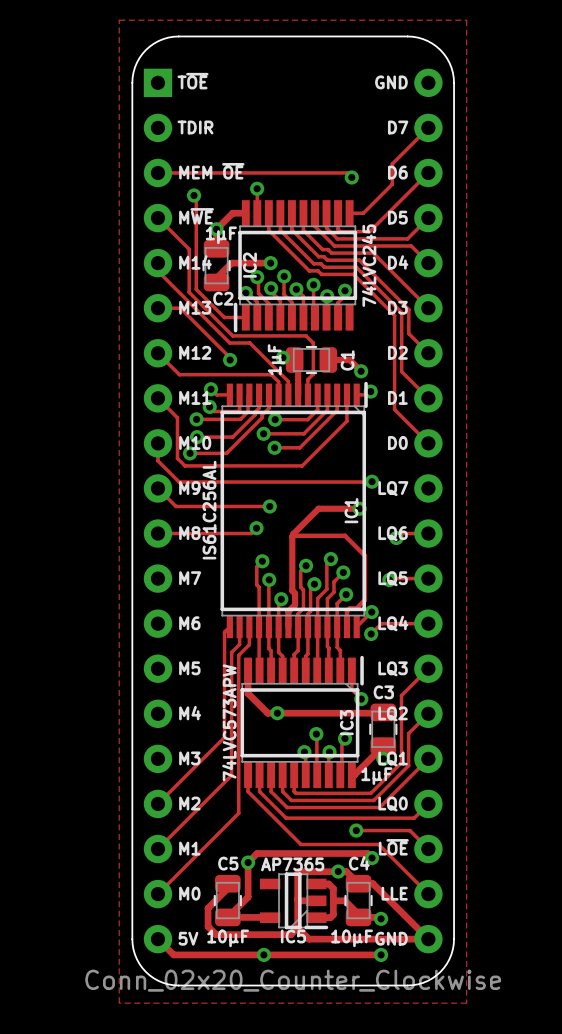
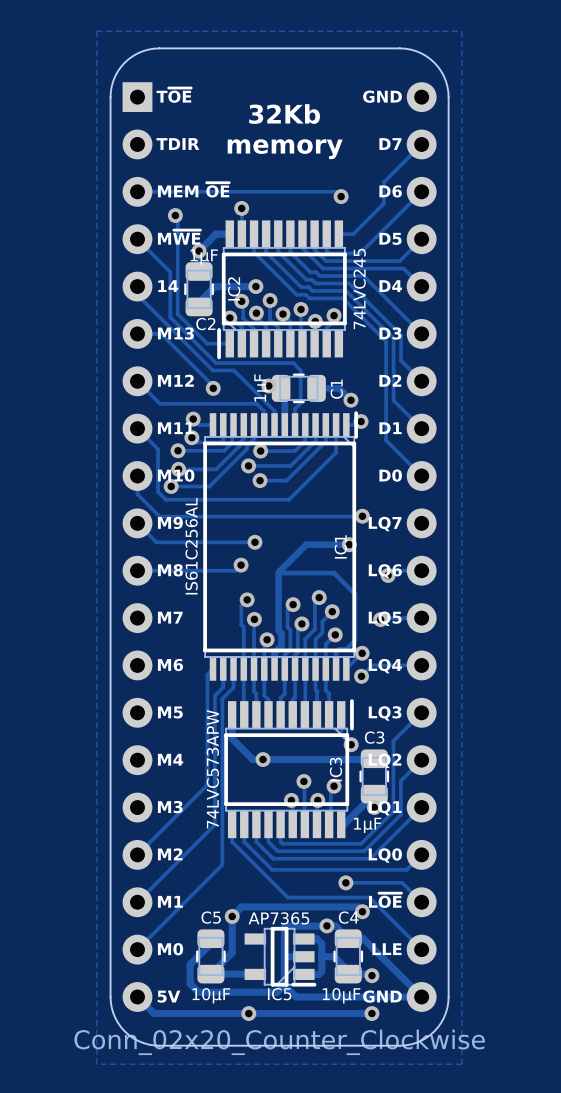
text: none -> 32Kb (284, 114)
text: none -> memory (285, 149)
text: M14 (195, 262) -> 14 (168, 286)

